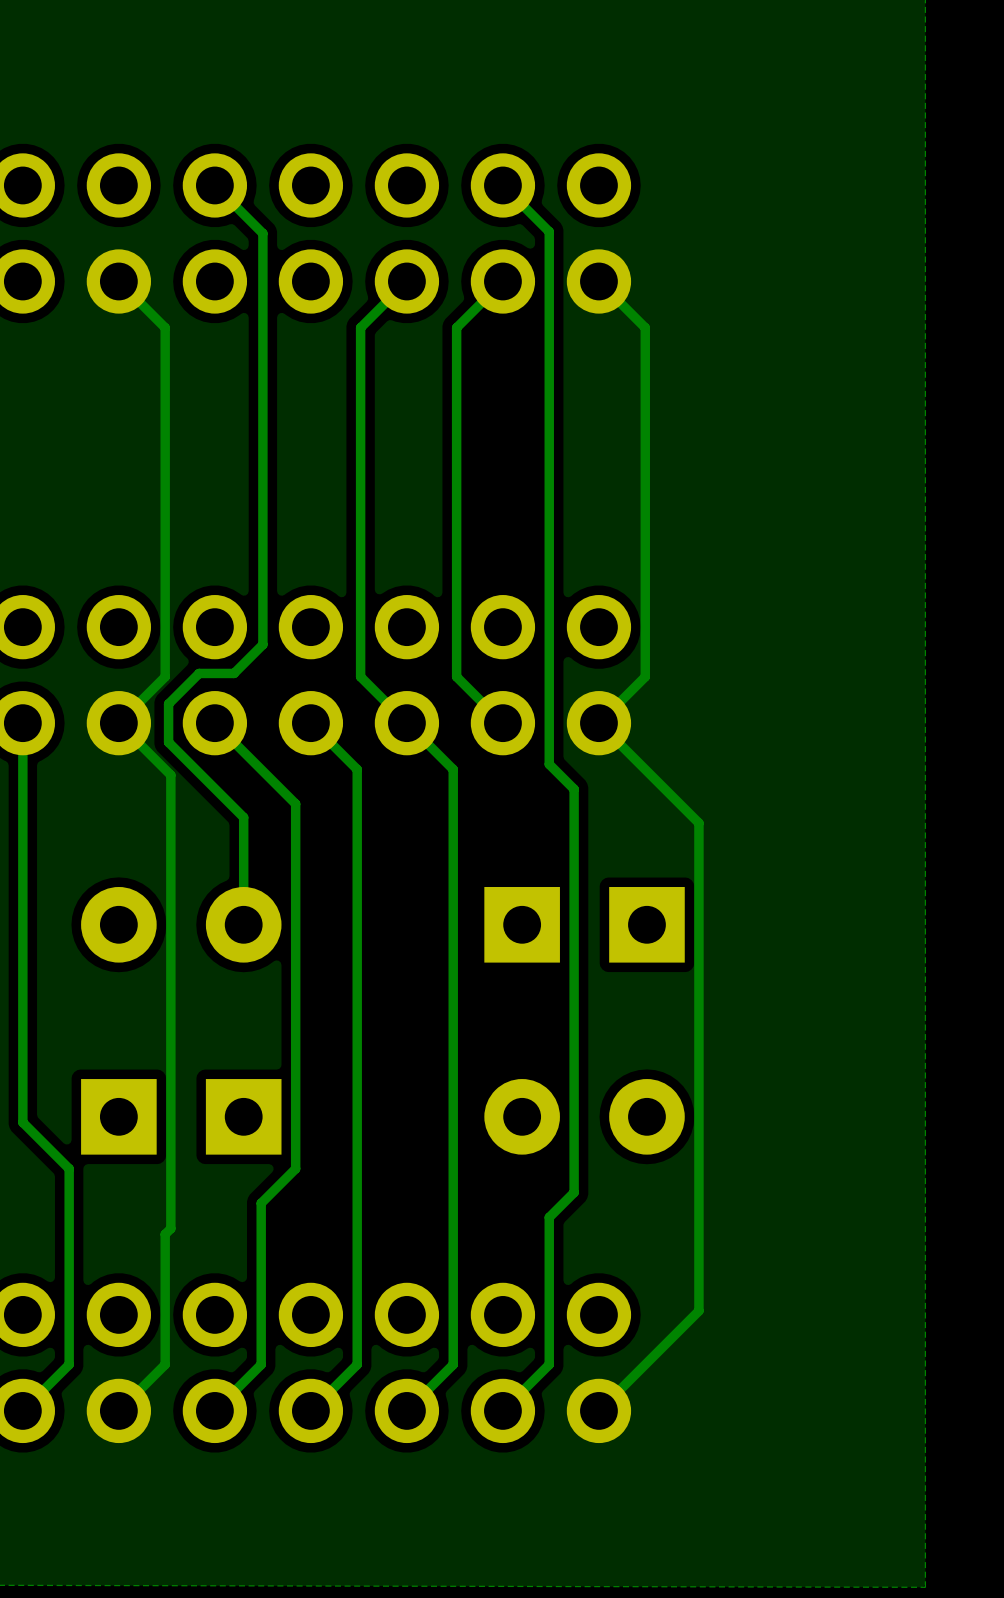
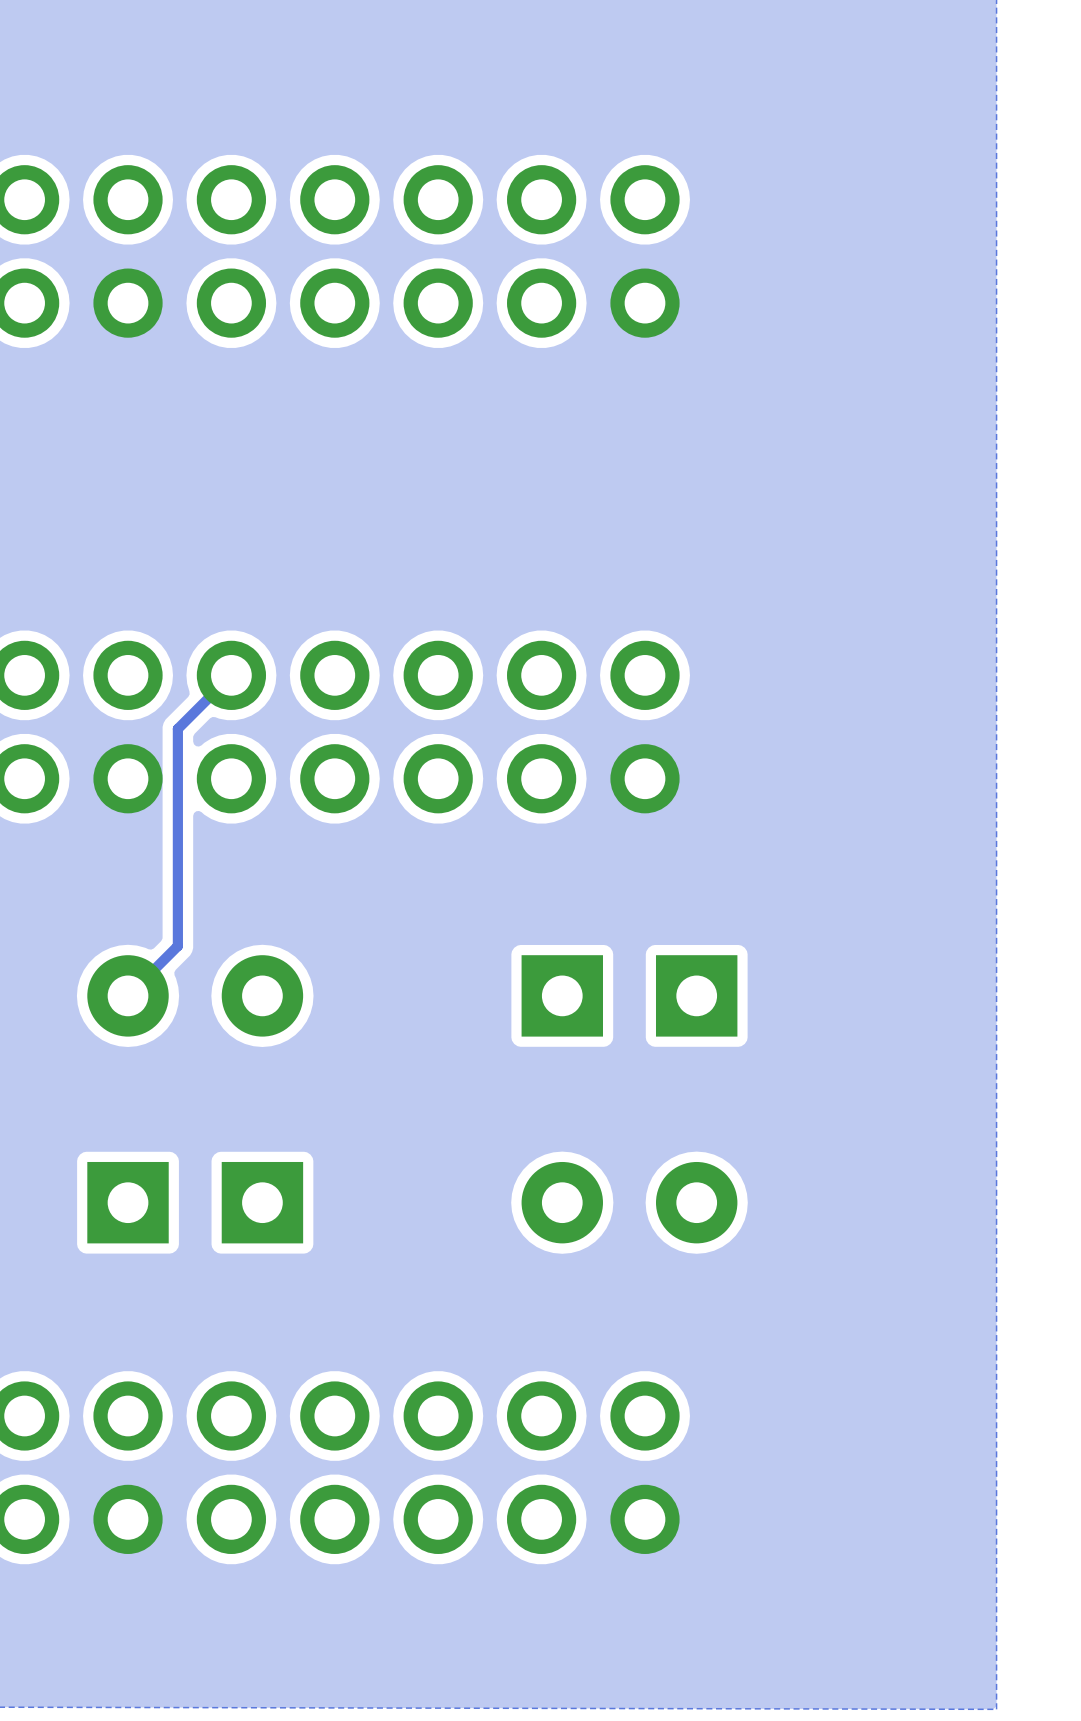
track: (214, 185) (262, 233) (262, 644) (234, 673) (199, 673) (168, 703) (168, 742) (243, 817) (243, 924) -> none
track: (502, 185) (549, 231) (549, 764) (574, 789) (574, 1192) (549, 1217) (549, 1364) (502, 1410) -> none
track: (118, 281) (165, 327) (165, 676) (118, 723) (170, 775) (170, 1228) (165, 1234) (165, 1364) (118, 1410) -> none
track: (406, 281) (360, 327) (360, 676) (453, 769) (453, 1364) (406, 1410) -> none
track: (502, 281) (456, 327) (456, 676) (502, 723) -> none
track: (598, 281) (645, 327) (645, 676) (598, 723) (698, 823) (698, 1310) (598, 1410) -> none
track: none -> (231, 675) (177, 728) (177, 946) (128, 995)
track: (22, 723) (22, 1122) (69, 1168) (69, 1364) (22, 1410) -> none
track: (214, 723) (295, 803) (295, 1168) (261, 1203) (261, 1364) (214, 1410) -> none
track: (310, 723) (357, 769) (357, 1364) (310, 1410) -> none

